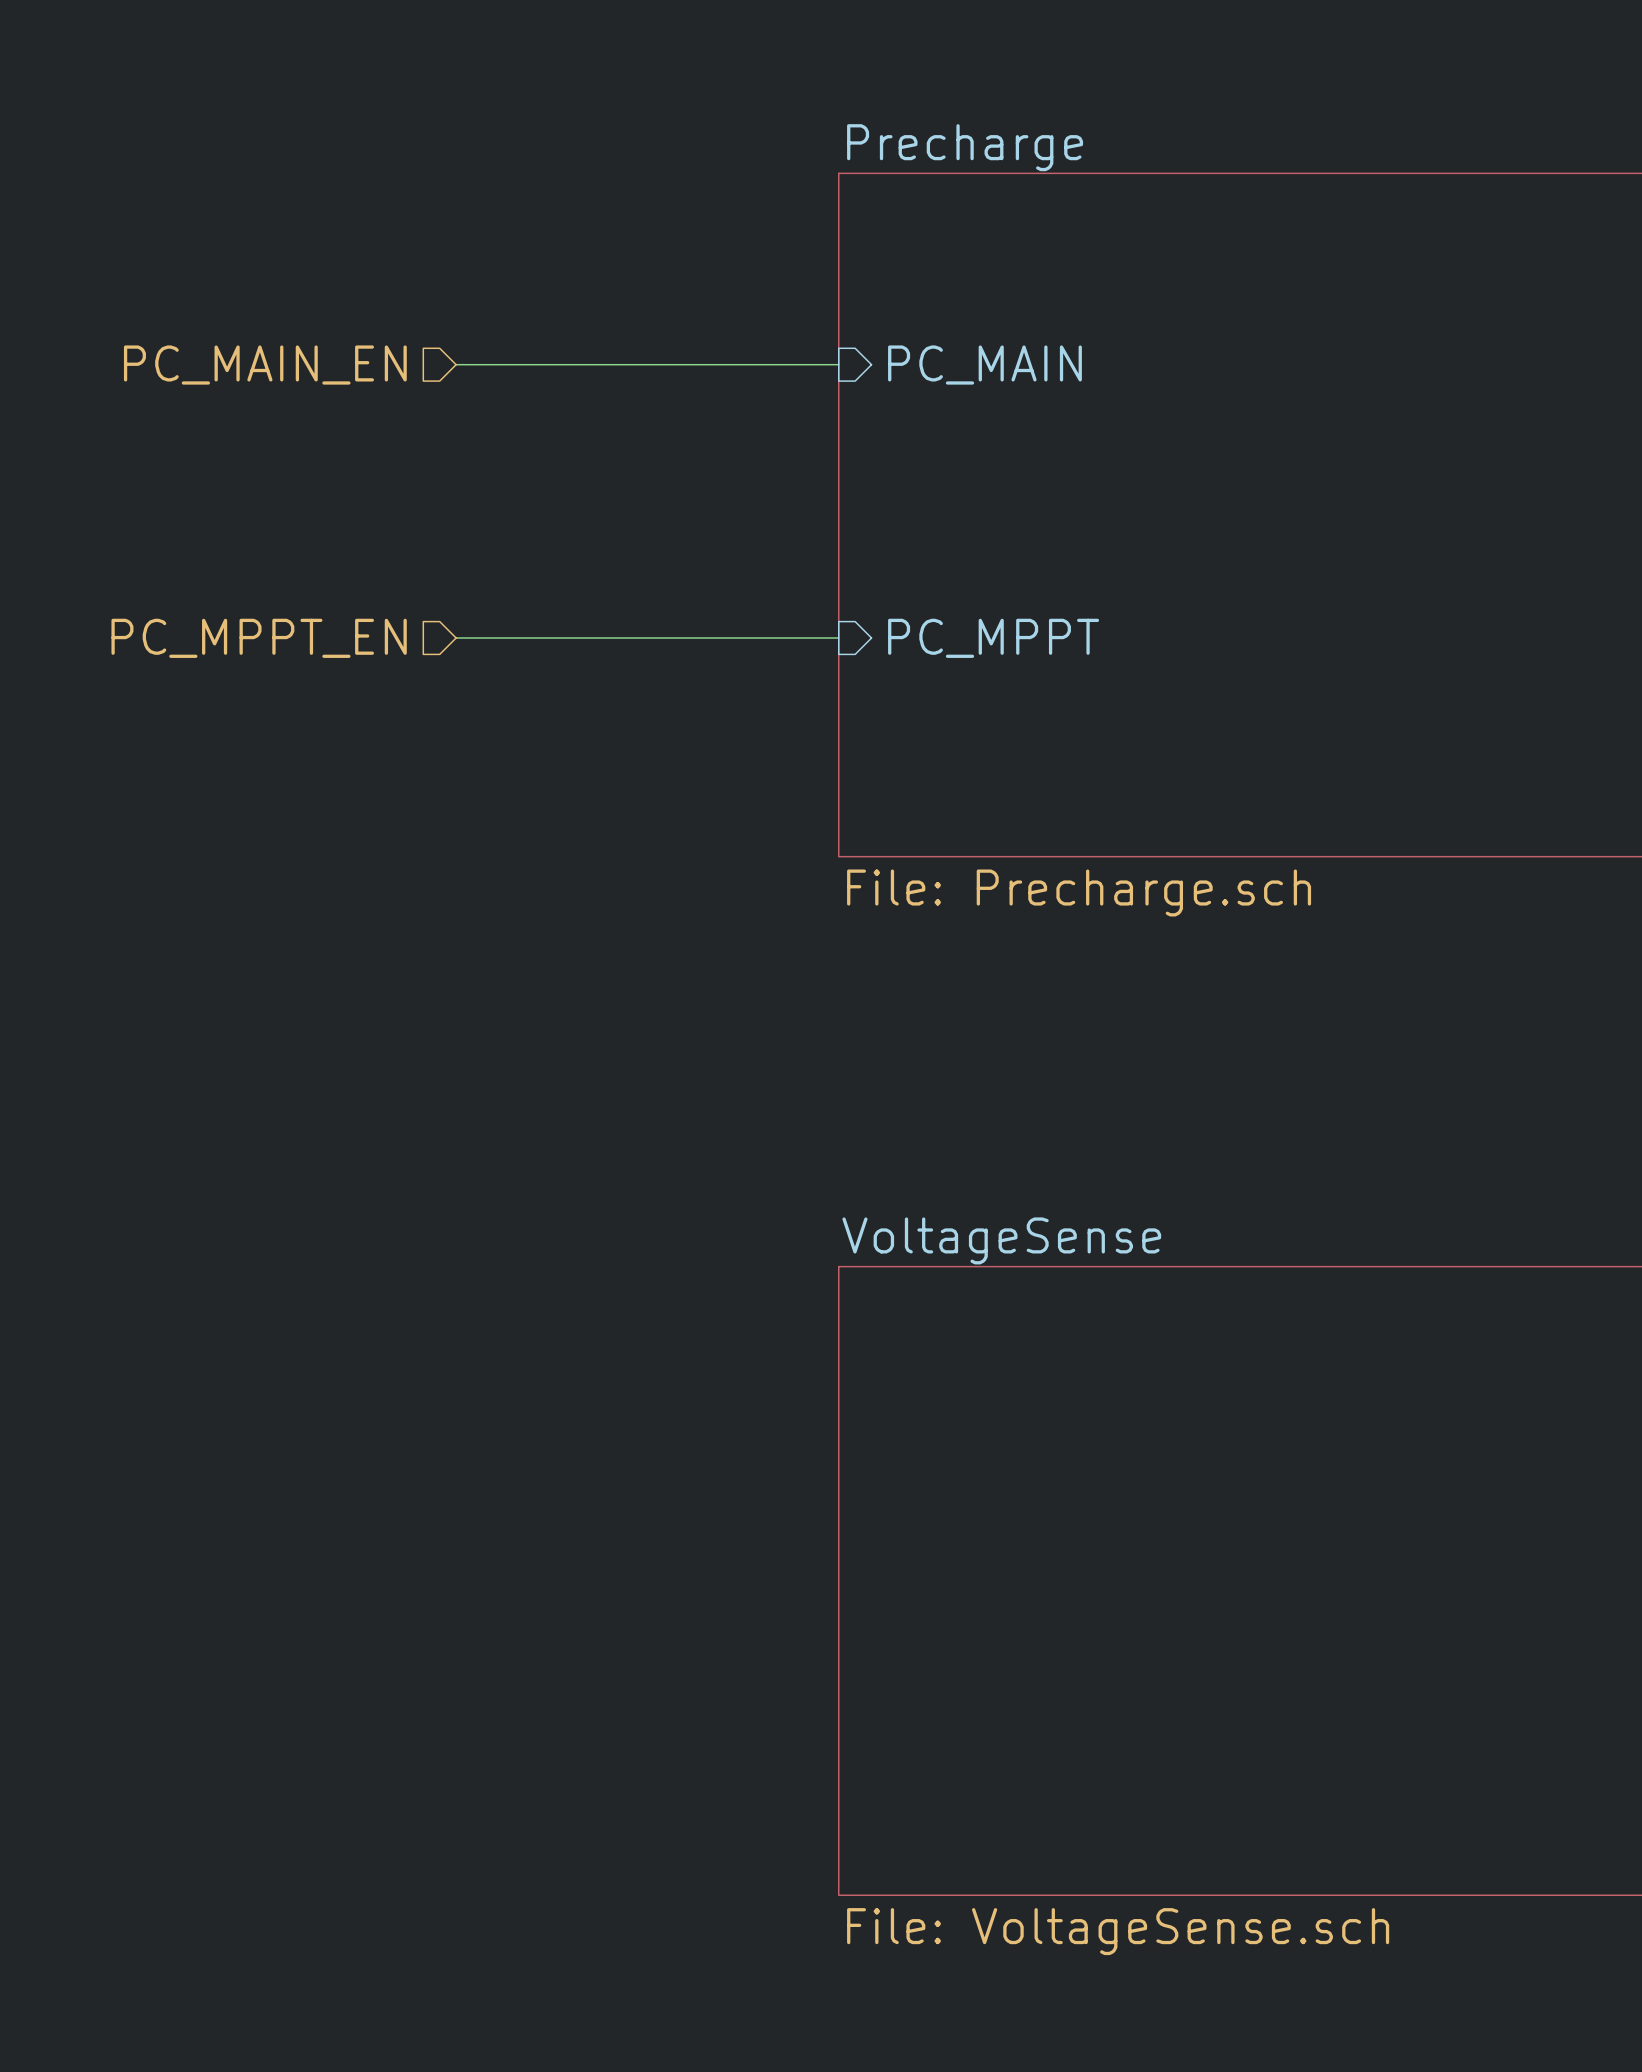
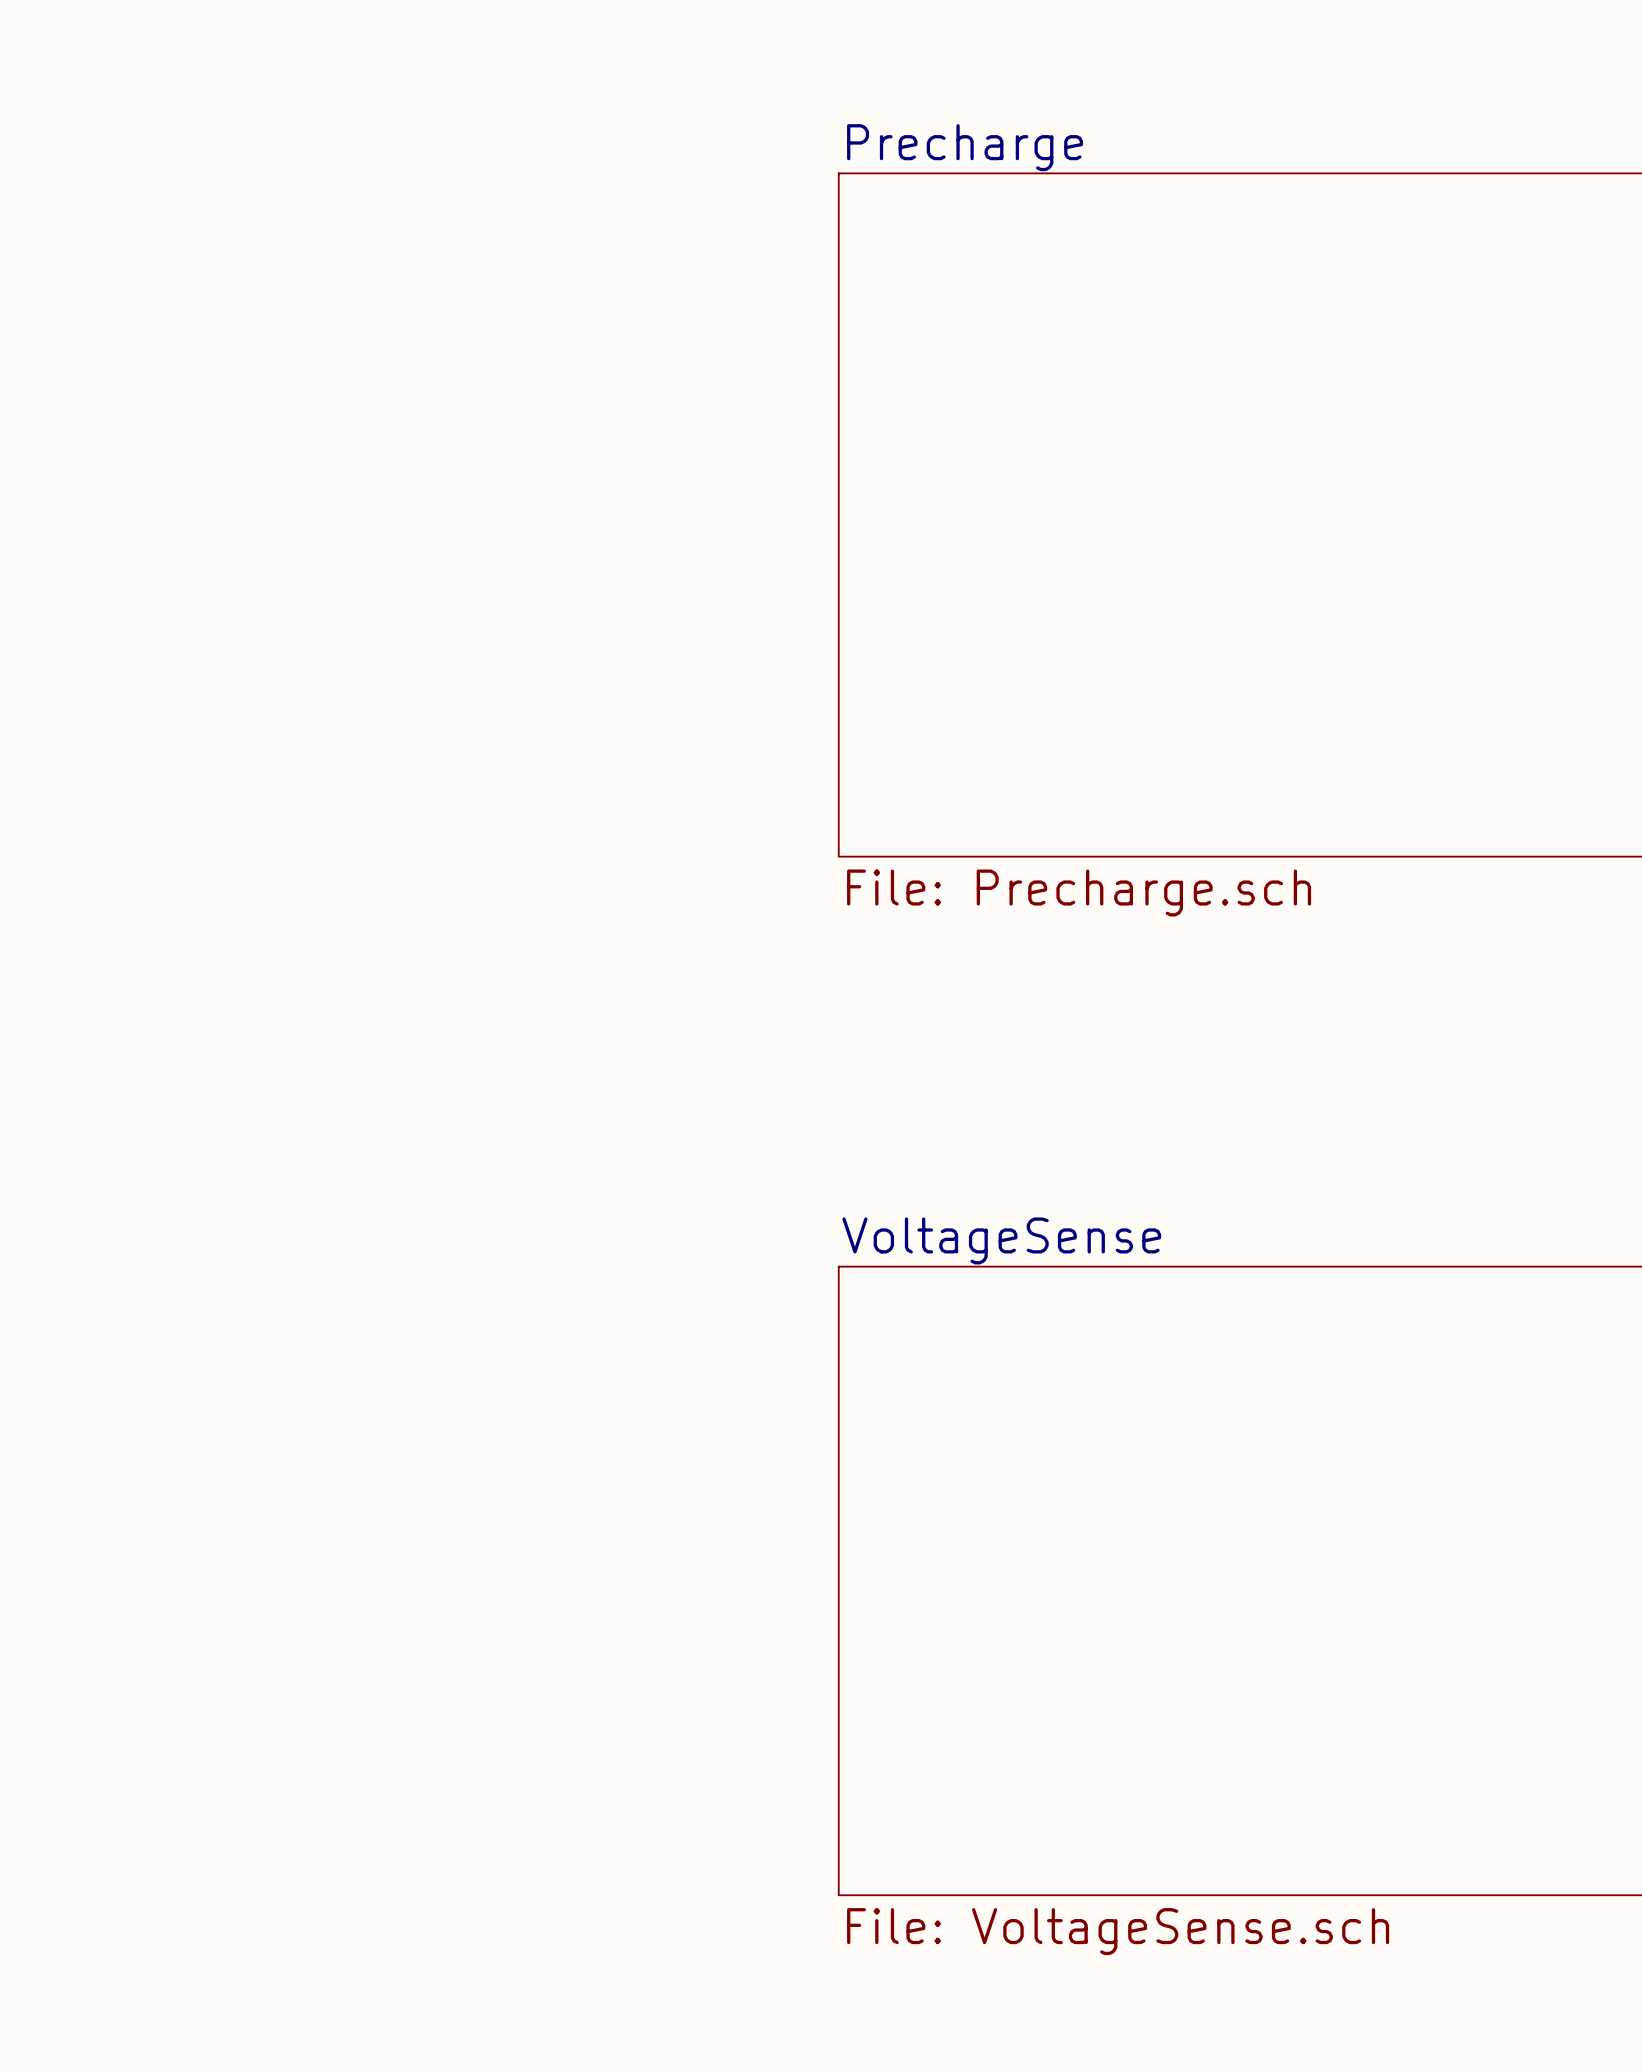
wire: (456, 364) (838, 364) -> none
hierarchical label: PC_MAIN_EN (265, 365) -> none
sheet pin: PC_MAIN (984, 365) -> none
hierarchical label: PC_MPPT_EN (259, 638) -> none
wire: (456, 638) (838, 638) -> none
sheet pin: PC_MPPT (993, 638) -> none

